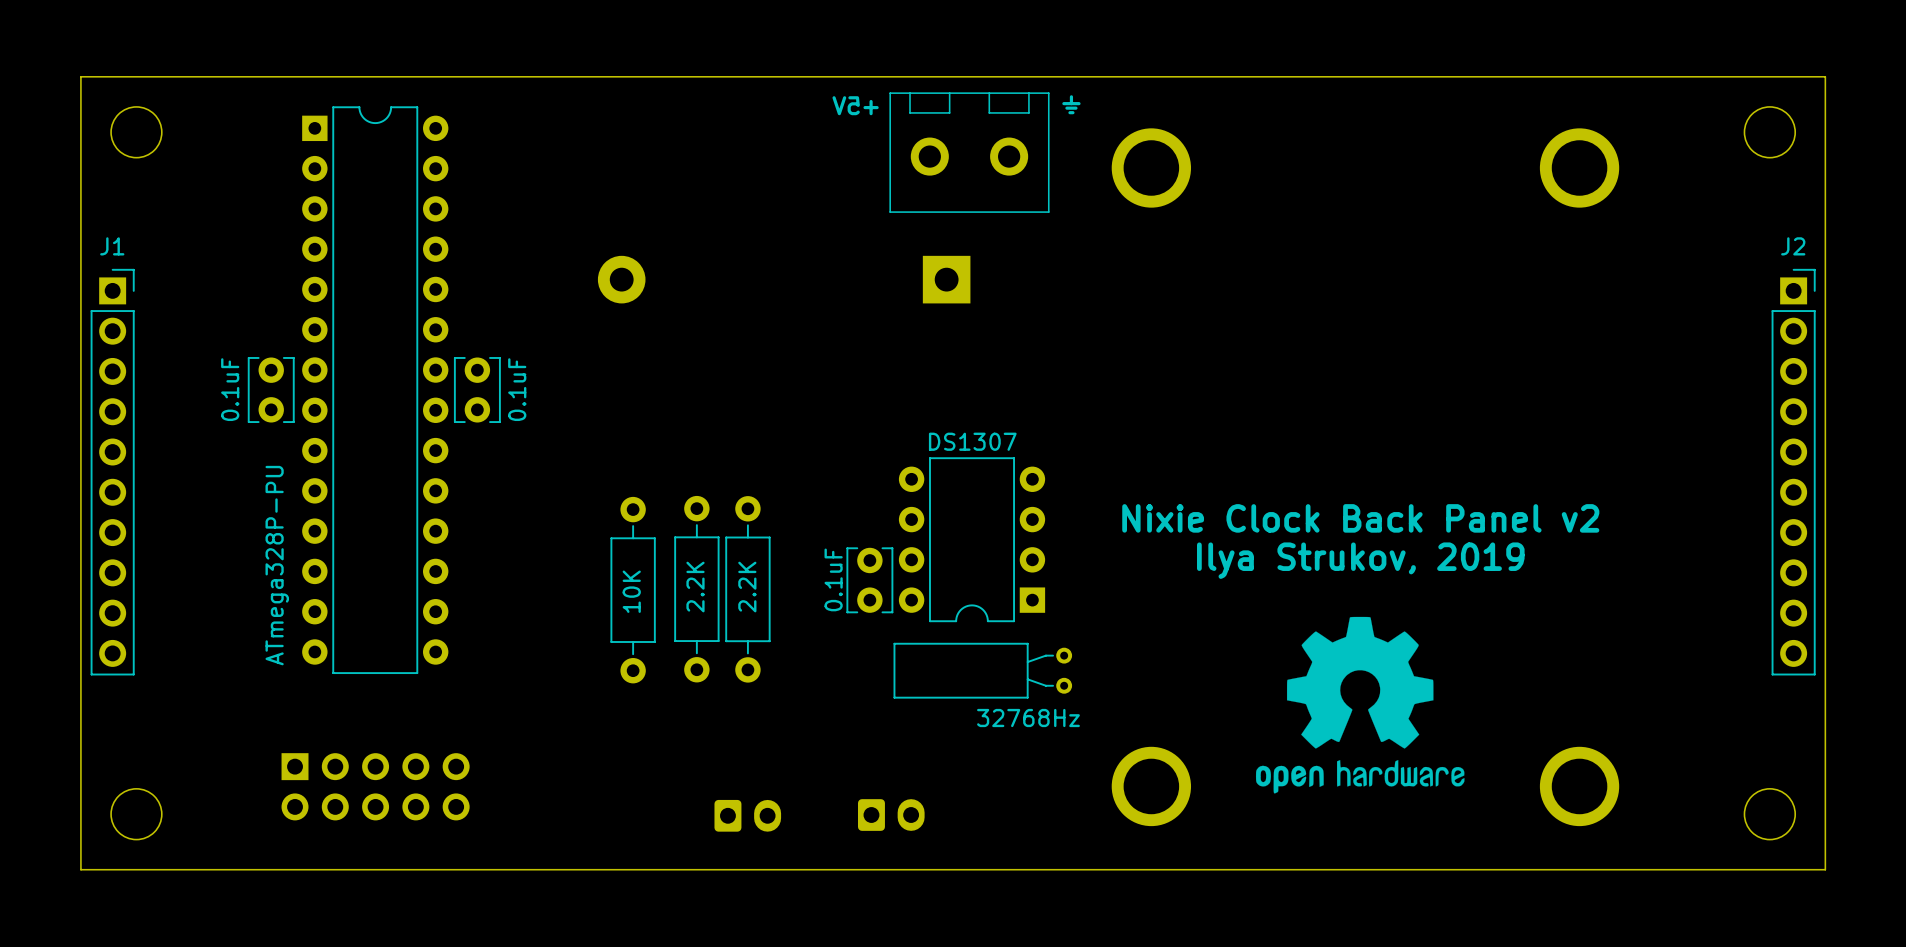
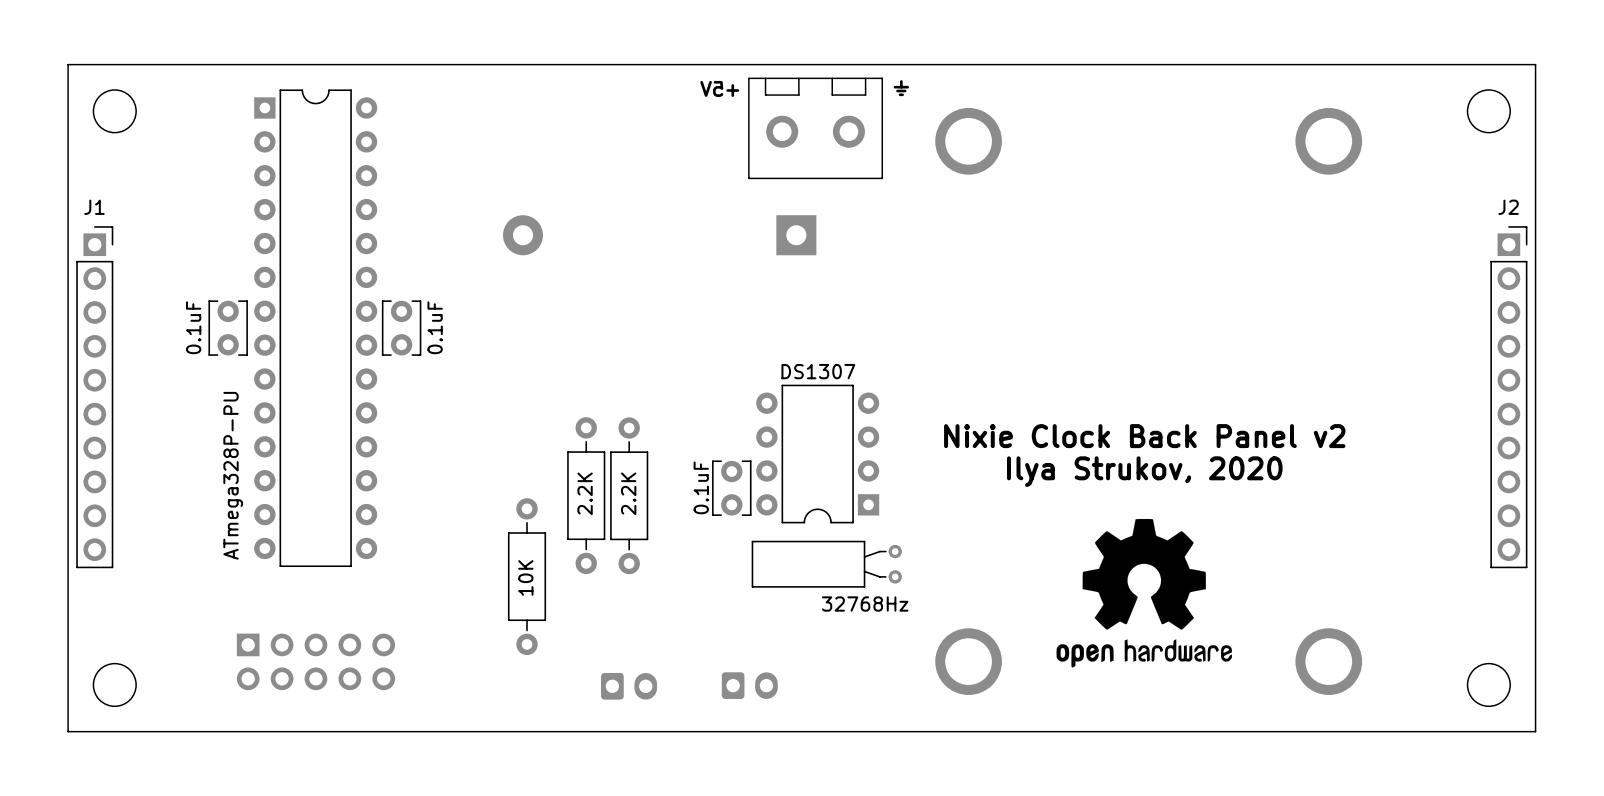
text: Ilya Strukov, 2019 (1360, 560) -> Ilya Strukov, 2020 (1144, 471)
part position: (633, 590) -> (527, 576)

